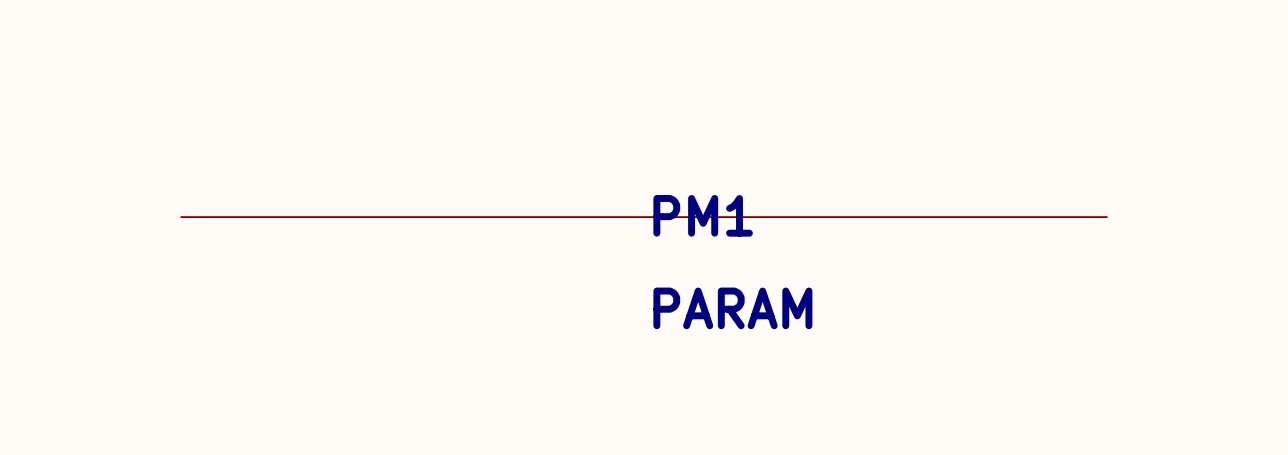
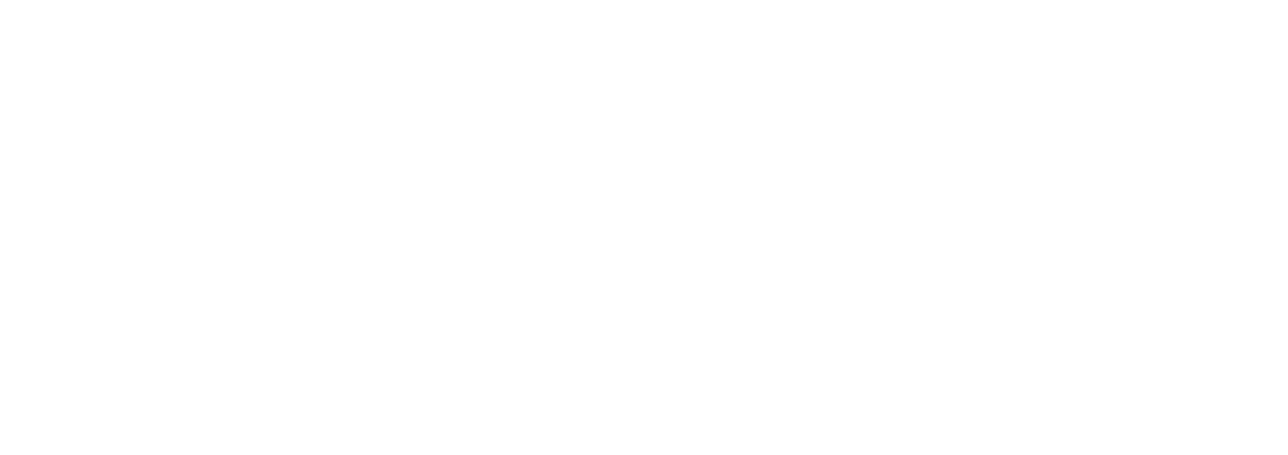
PM1: PARAM (644, 217) -> none

